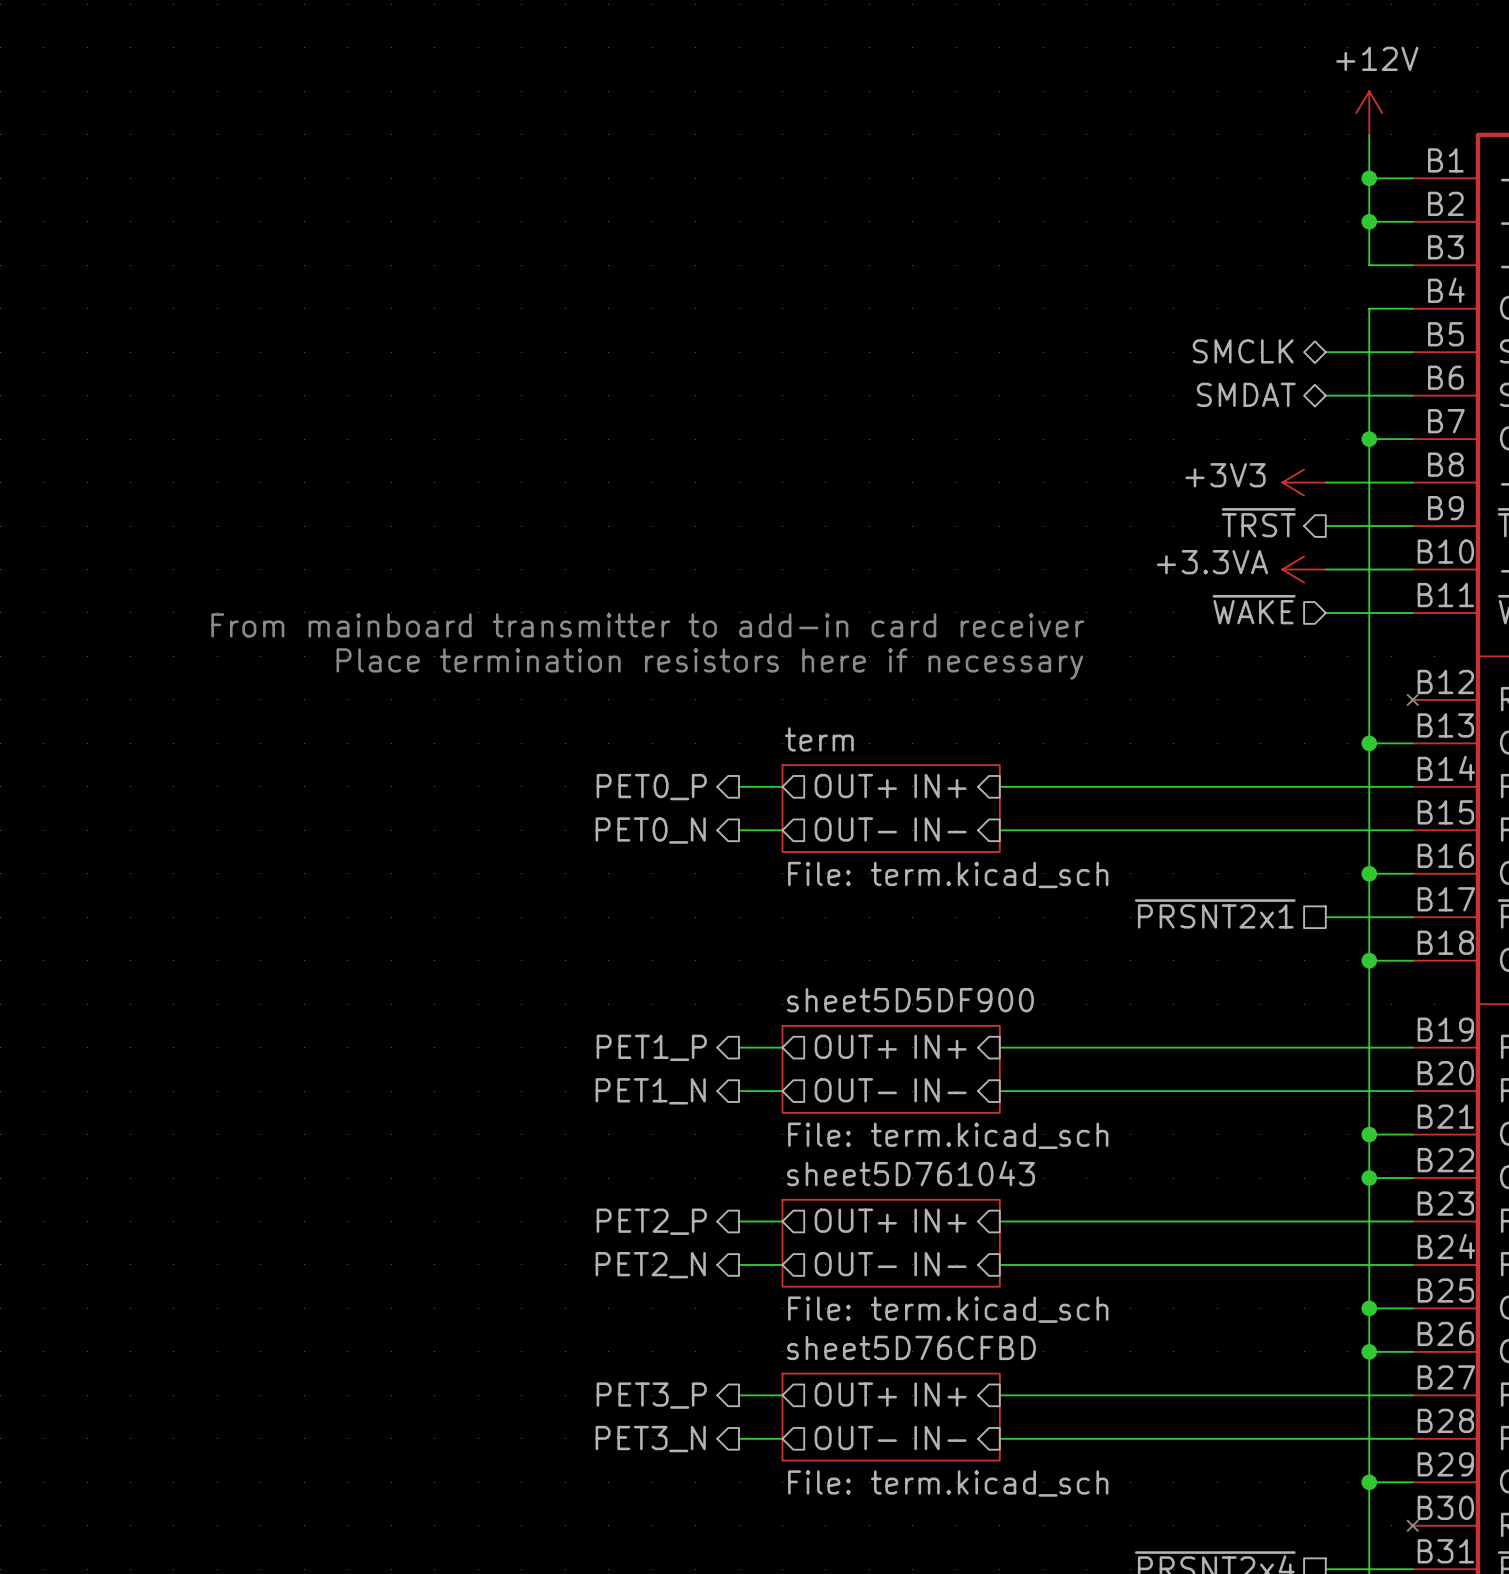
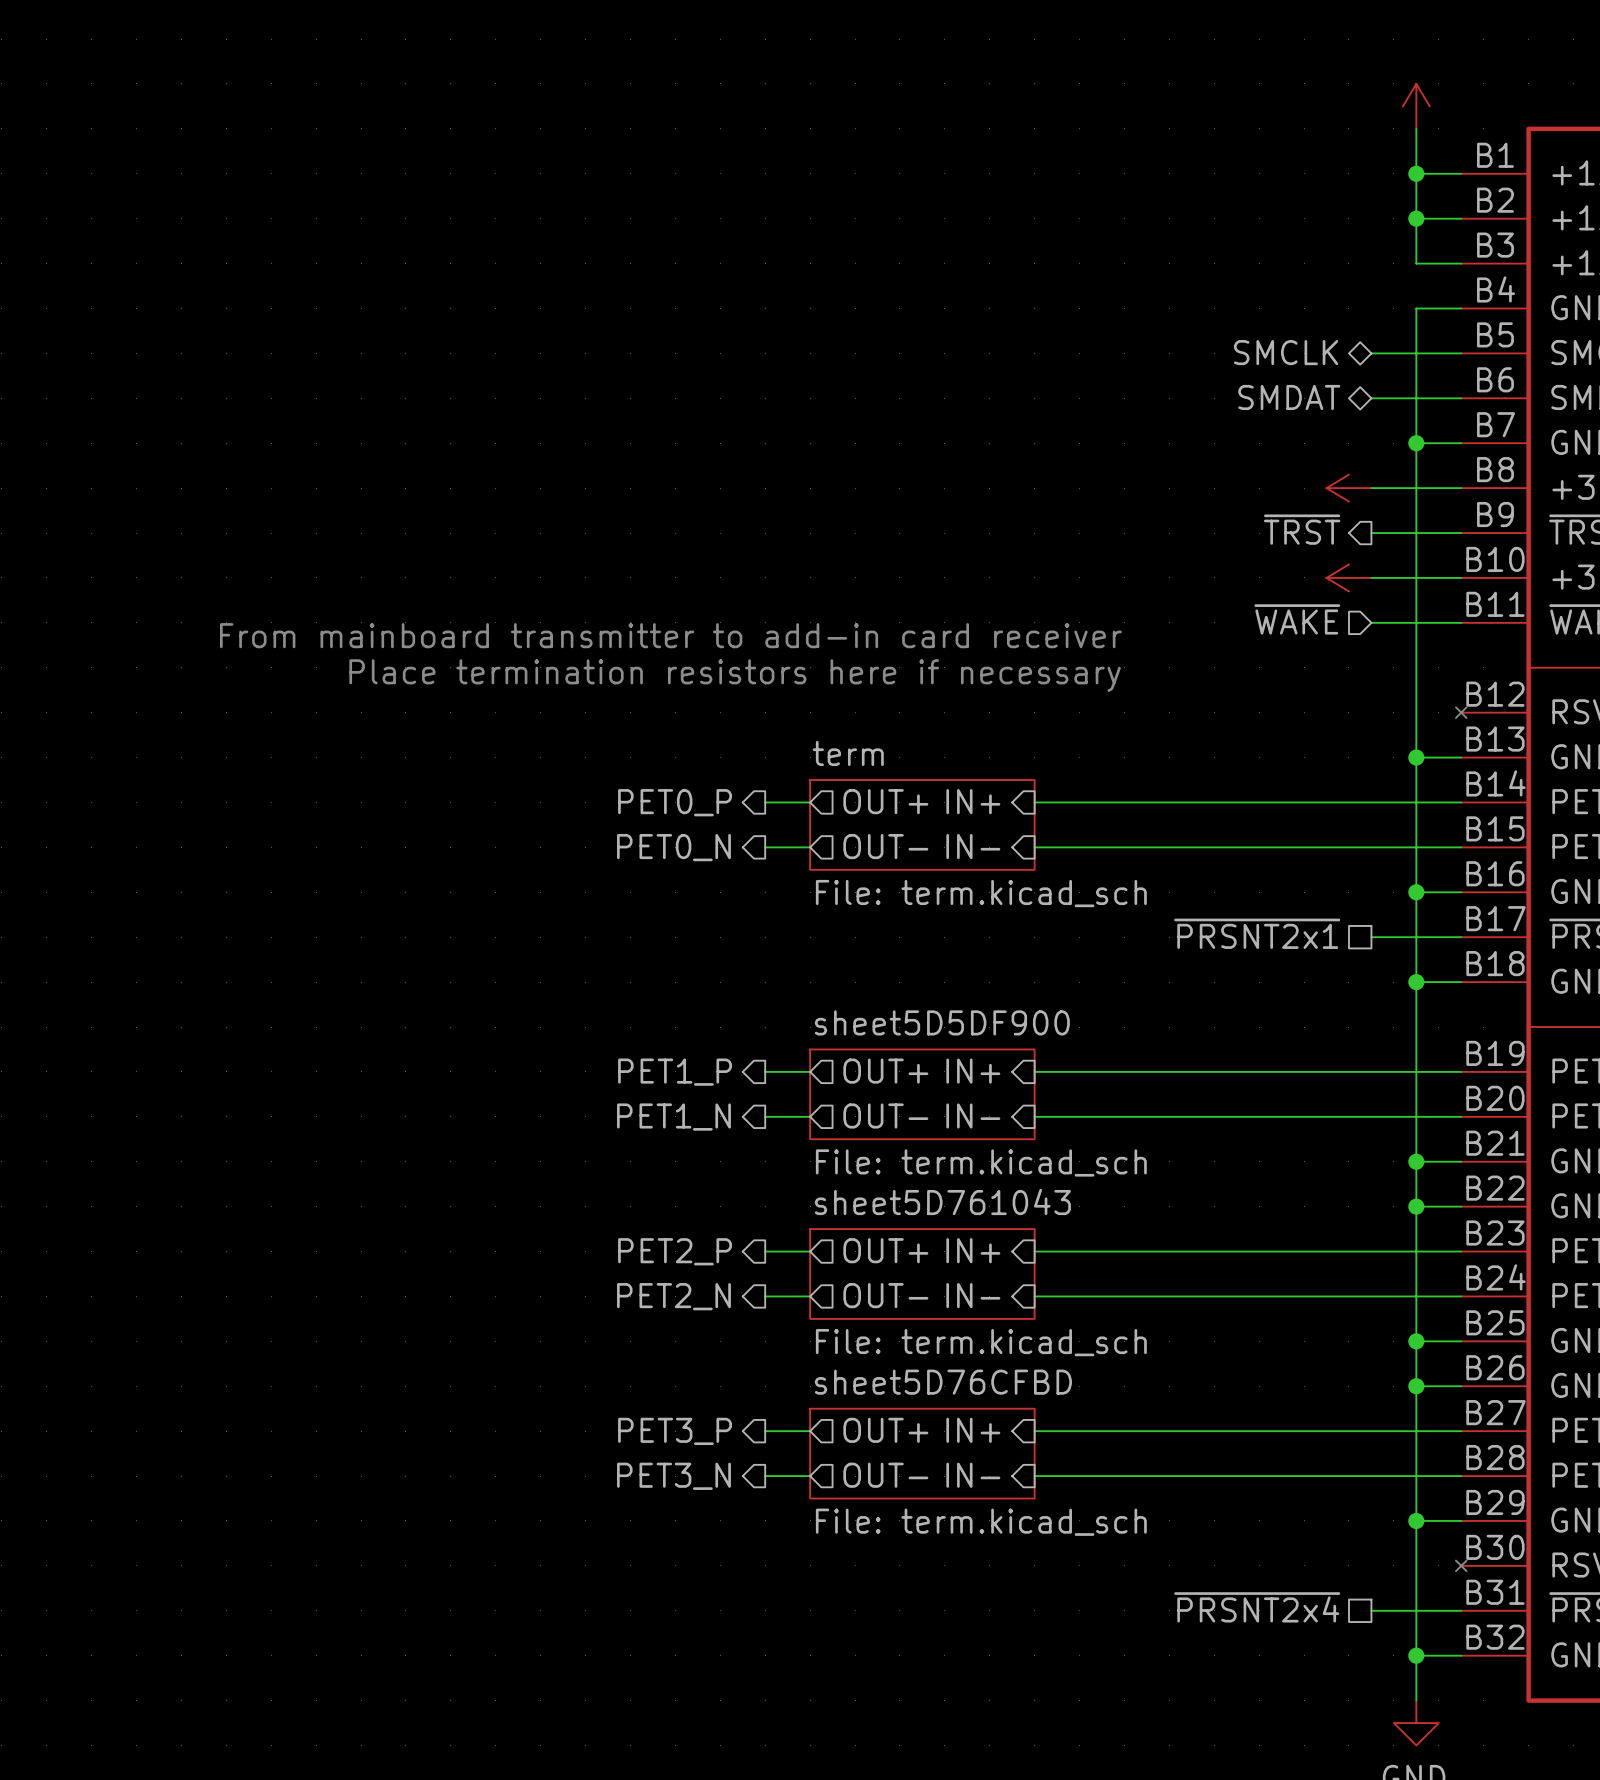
power symbol text: +12V (1377, 58) -> none
power symbol text: +3V3 (1225, 475) -> none
power symbol text: +3.3VA (1212, 562) -> none

